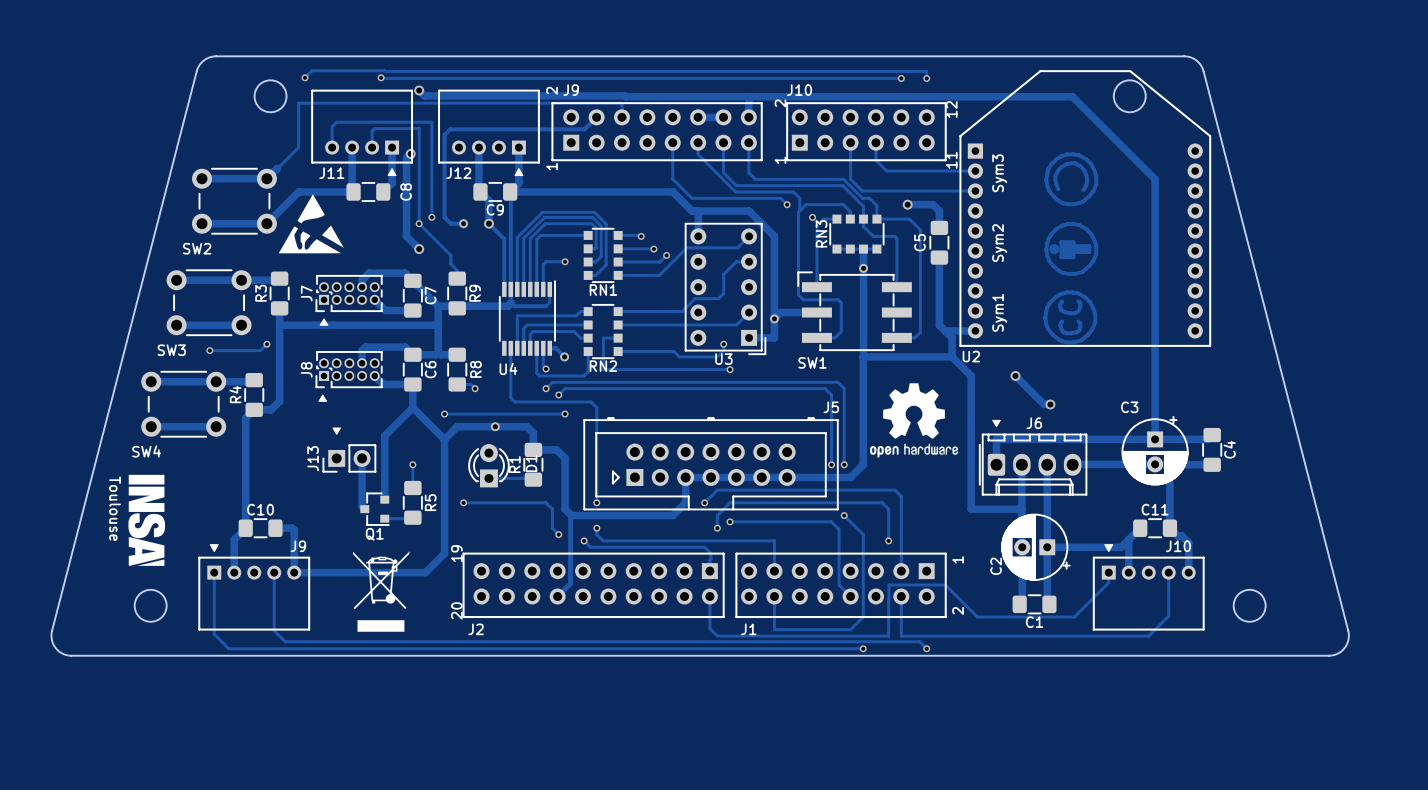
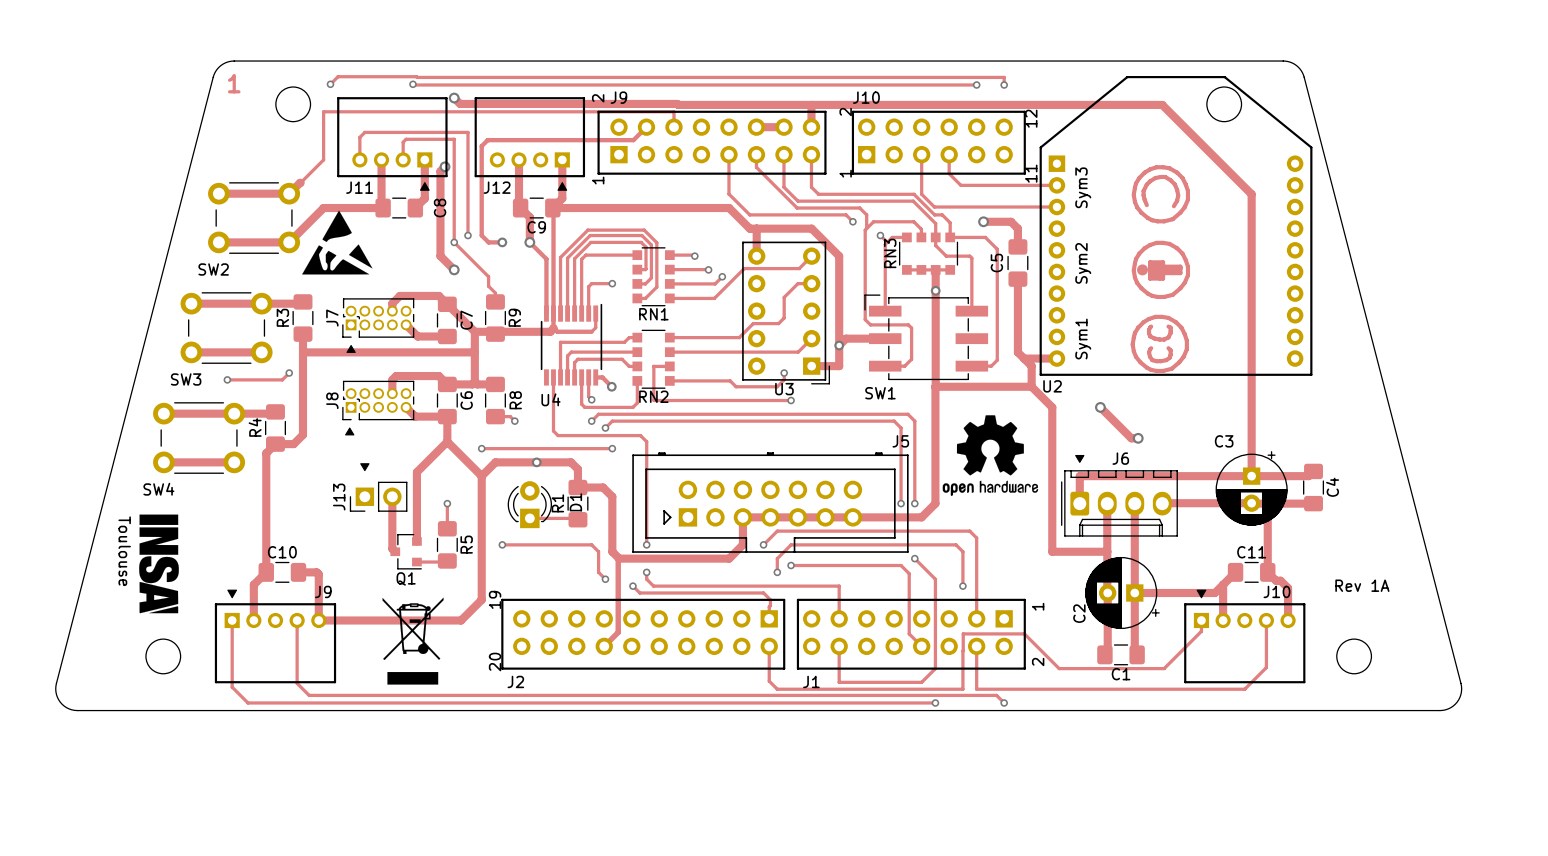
text: none -> 1 (234, 83)
text: none -> Rev 1A (1362, 585)

